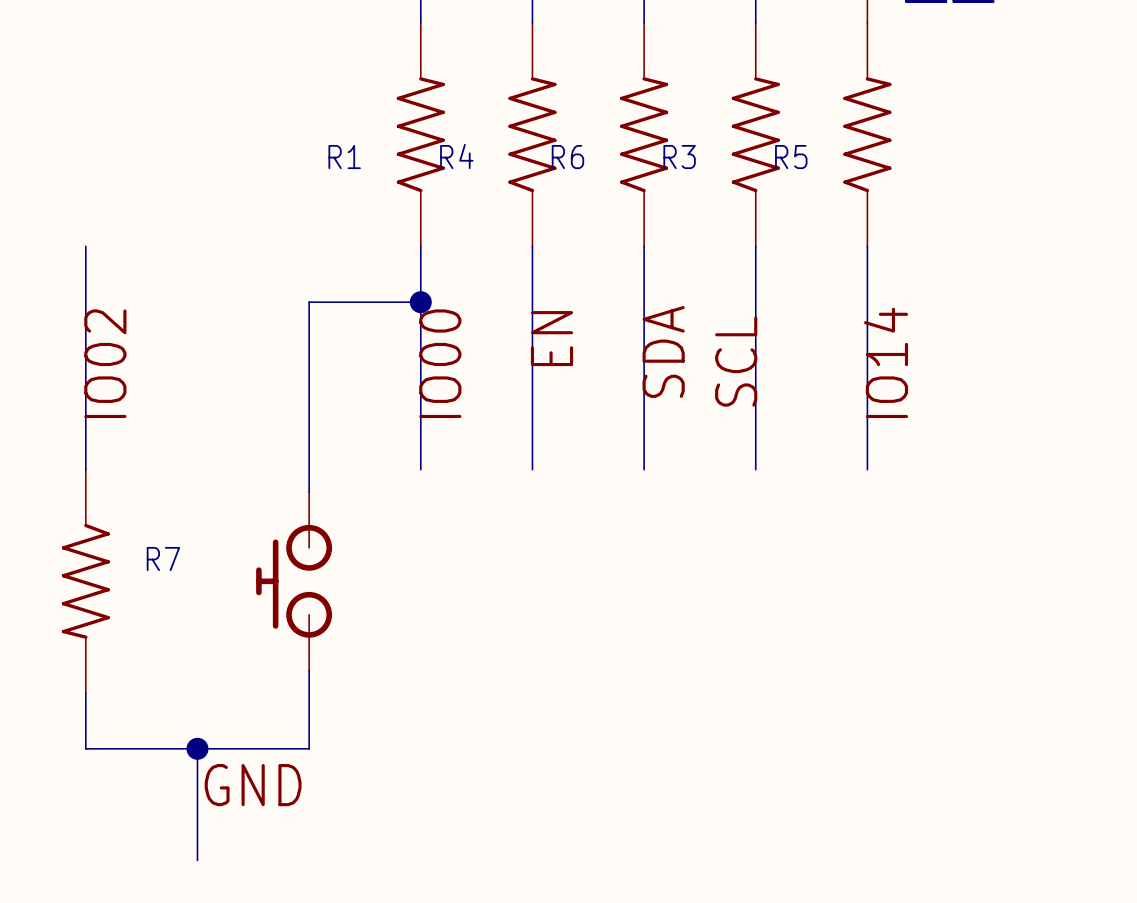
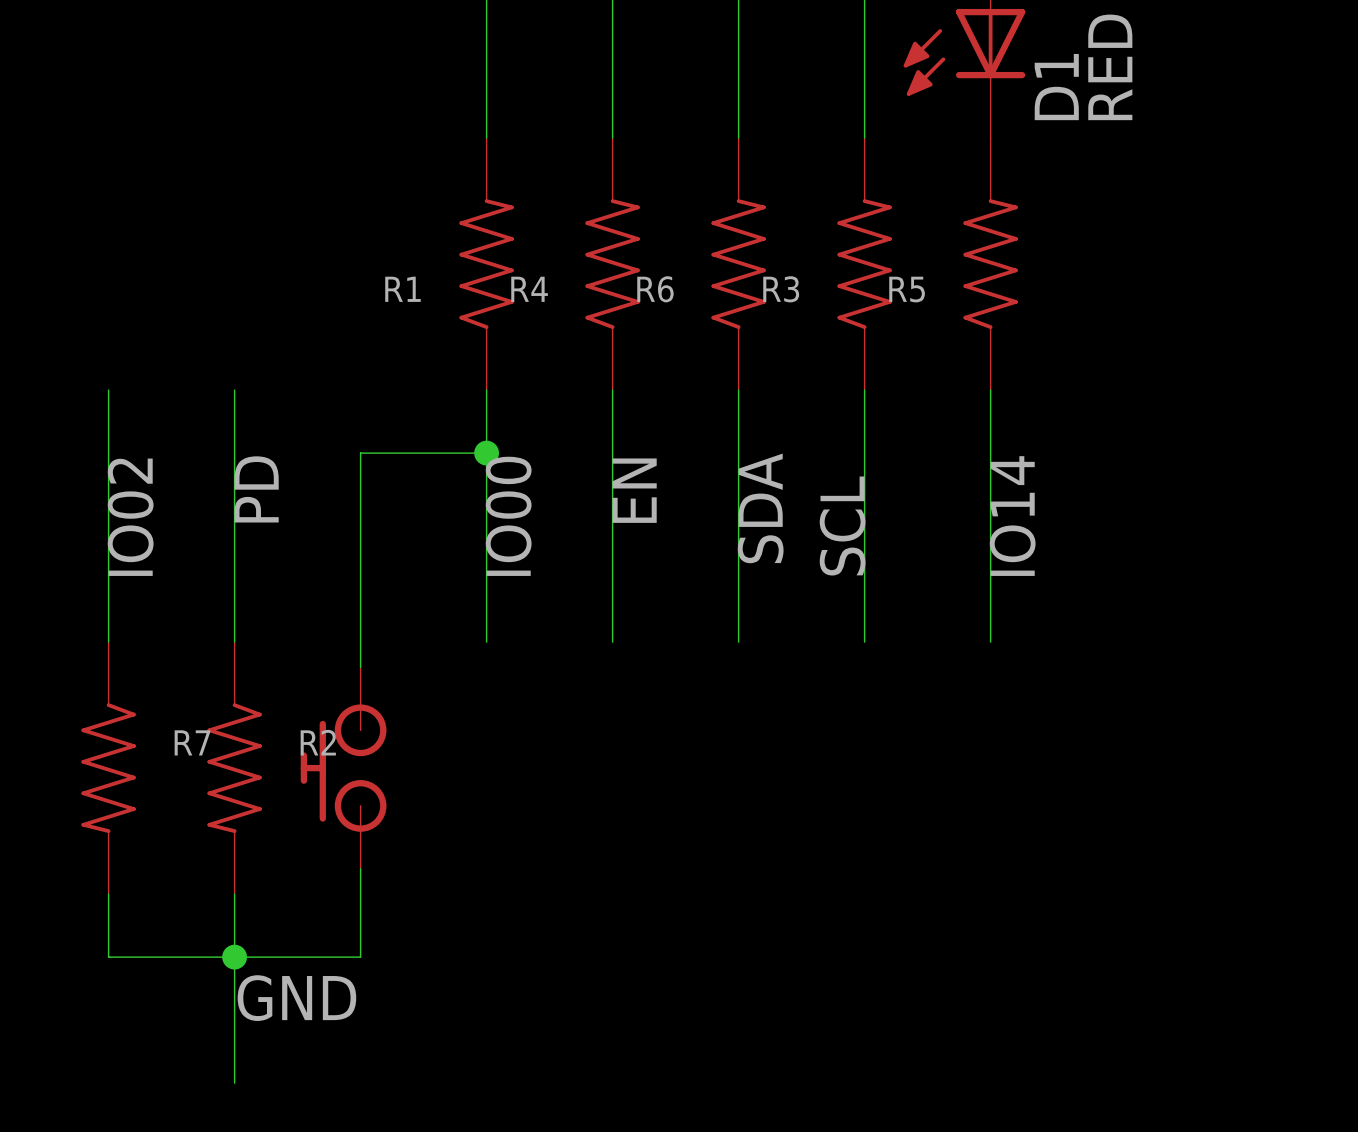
wire: none -> (234, 390) (234, 642)
label: none -> PD (256, 489)
R2: none -> (234, 768)
wire: none -> (234, 894) (234, 957)

